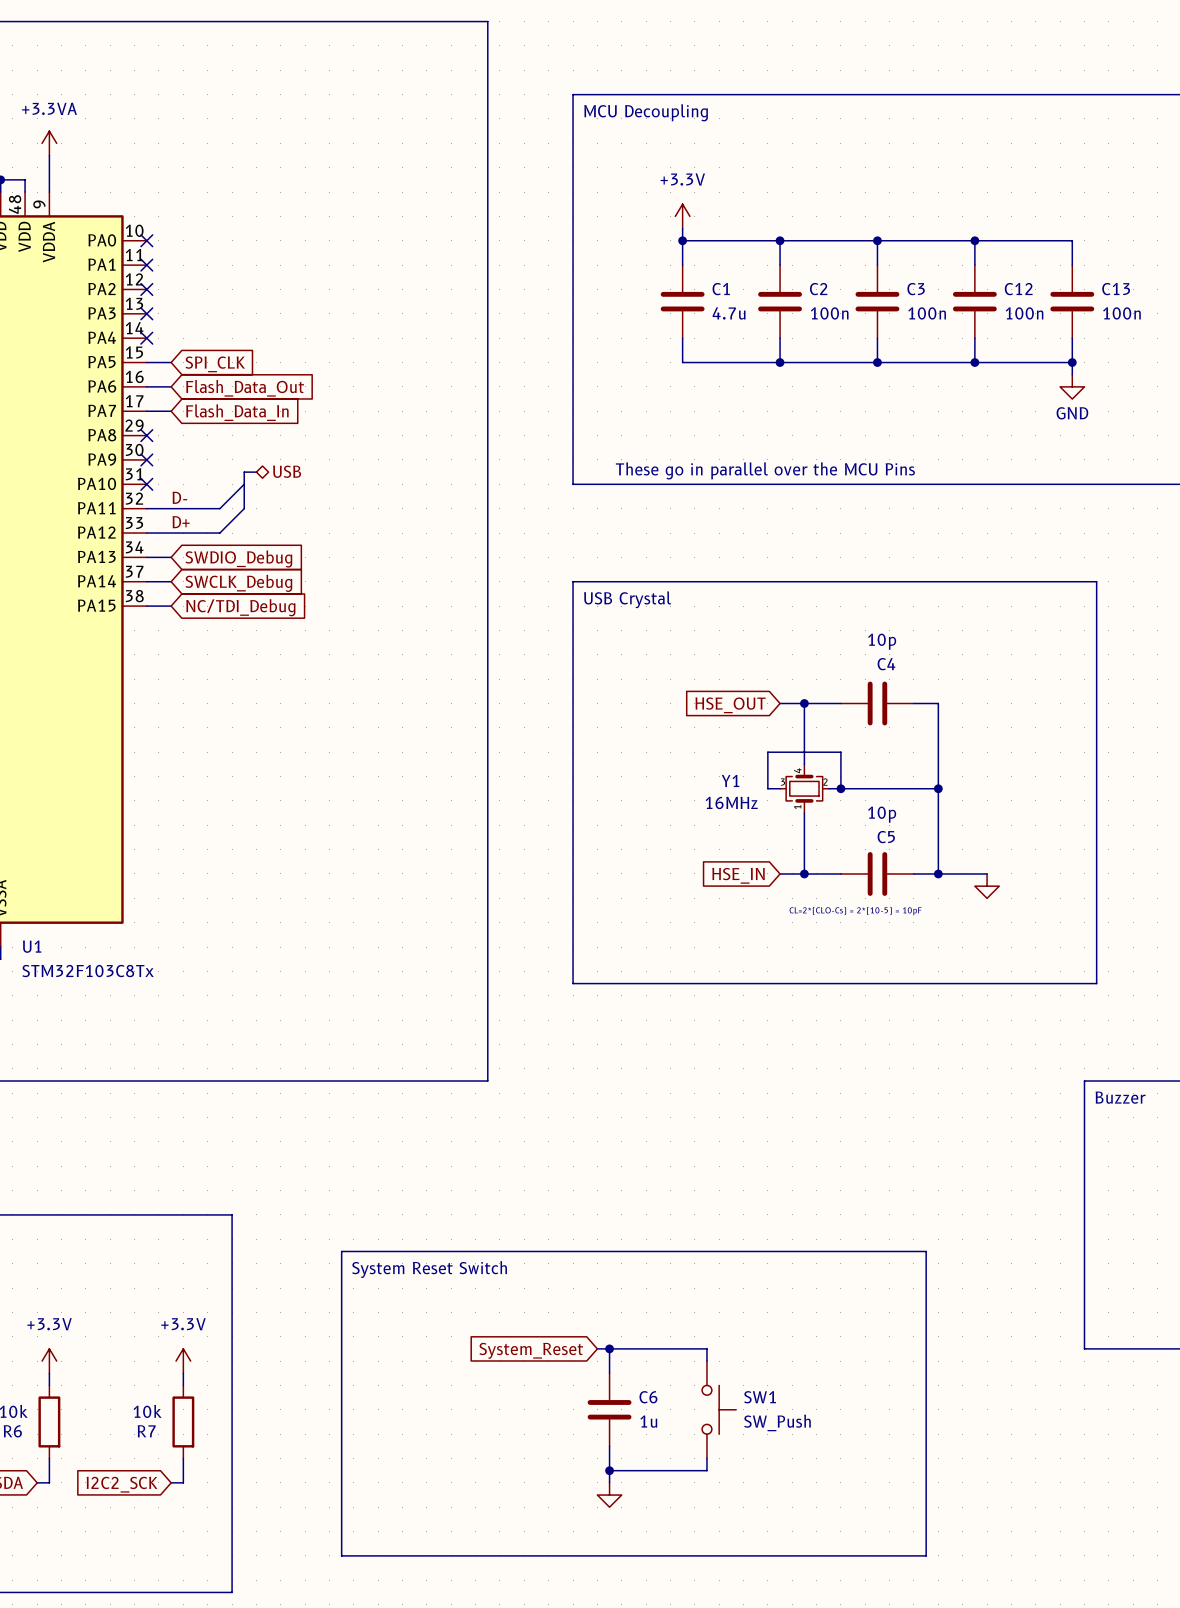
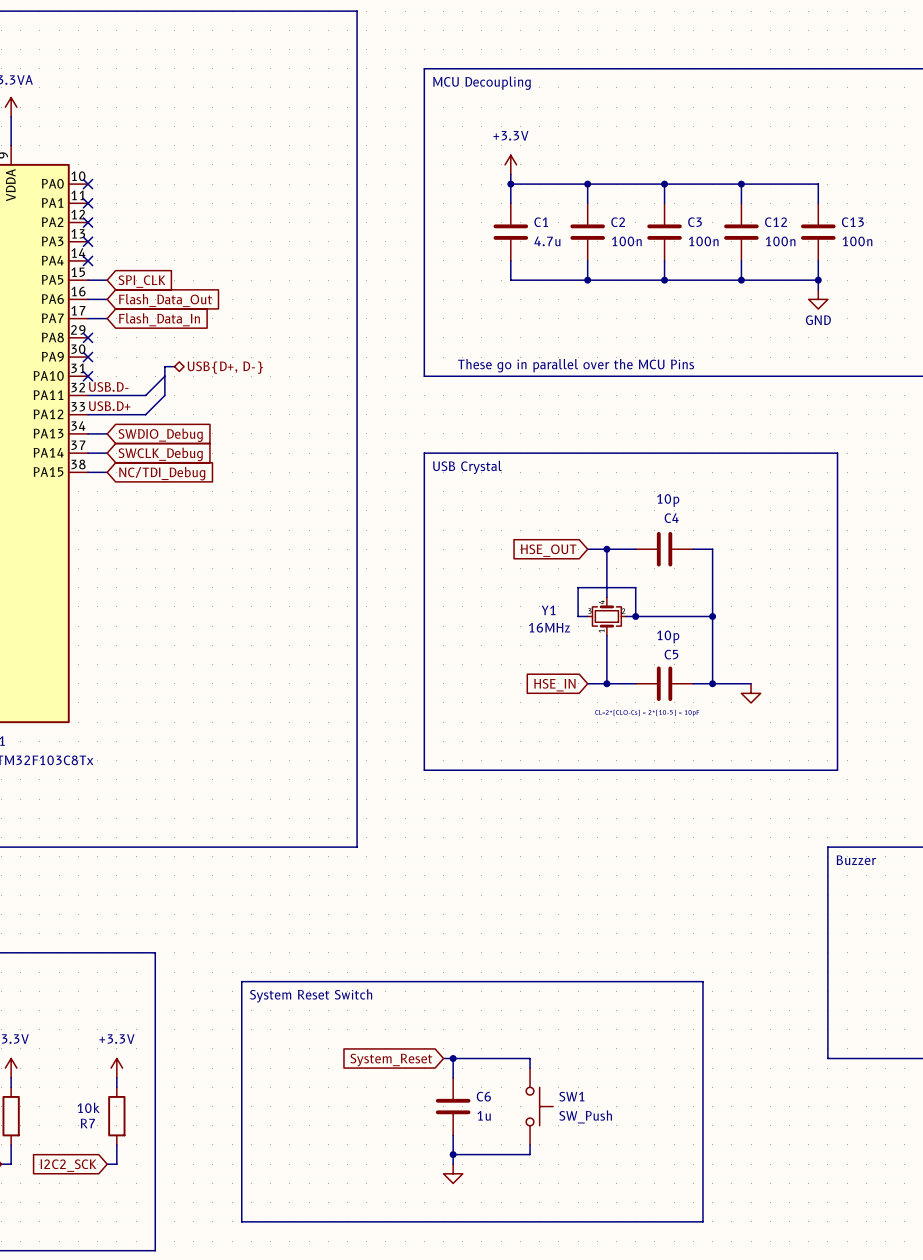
hierarchical label: USB (287, 471) -> USB{D+, D-} (225, 367)
label: none -> USB.D- (108, 386)
label: D- (179, 497) -> none
label: none -> USB.D+ (109, 406)
label: D+ (181, 522) -> none

